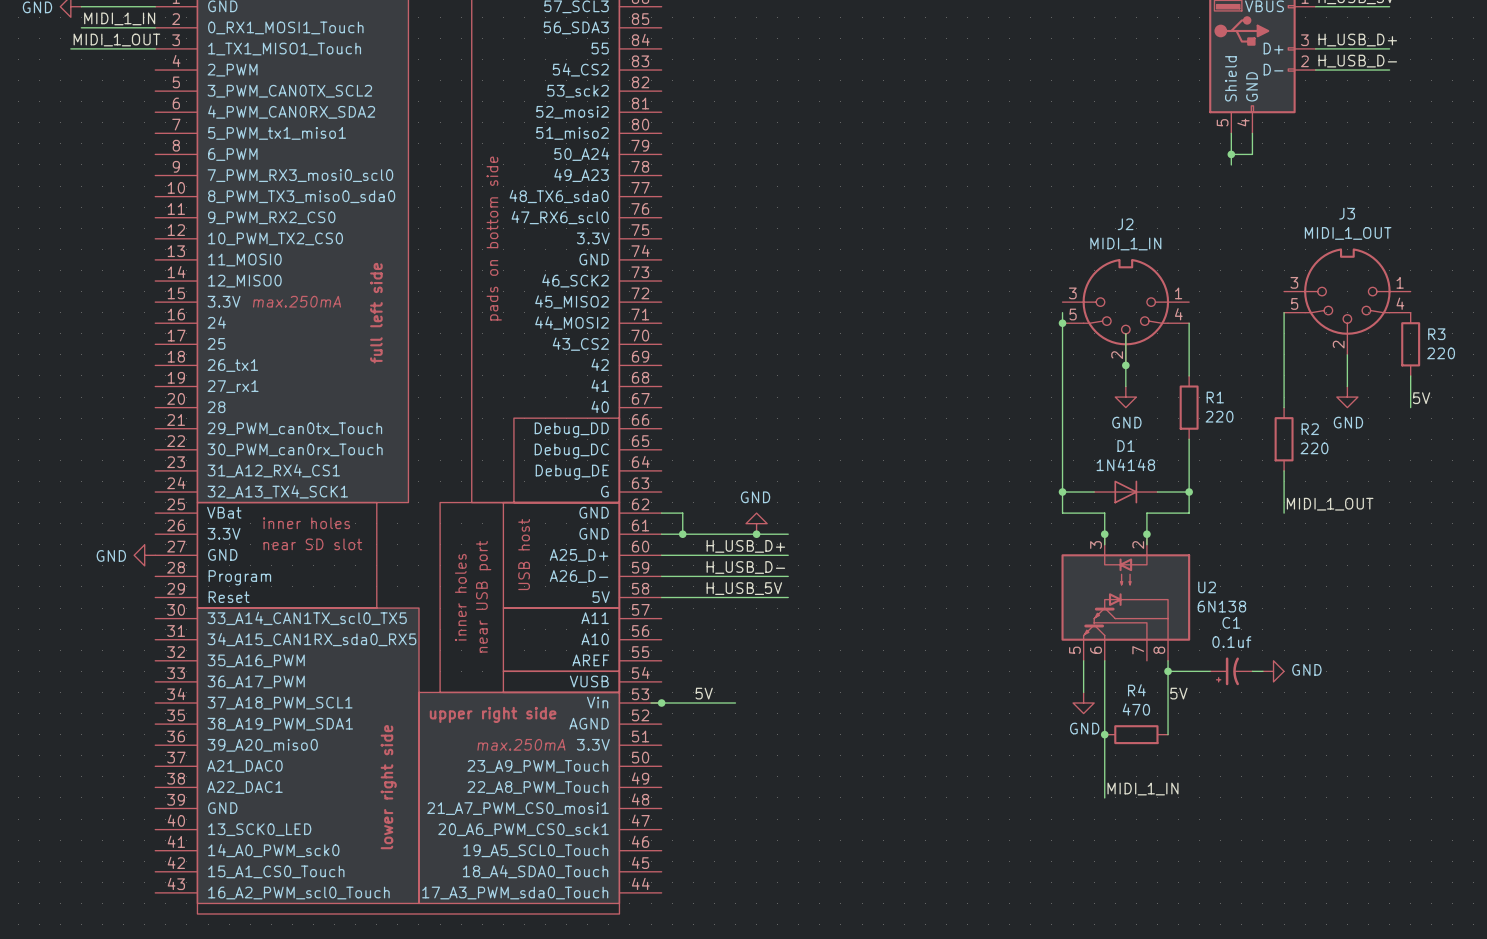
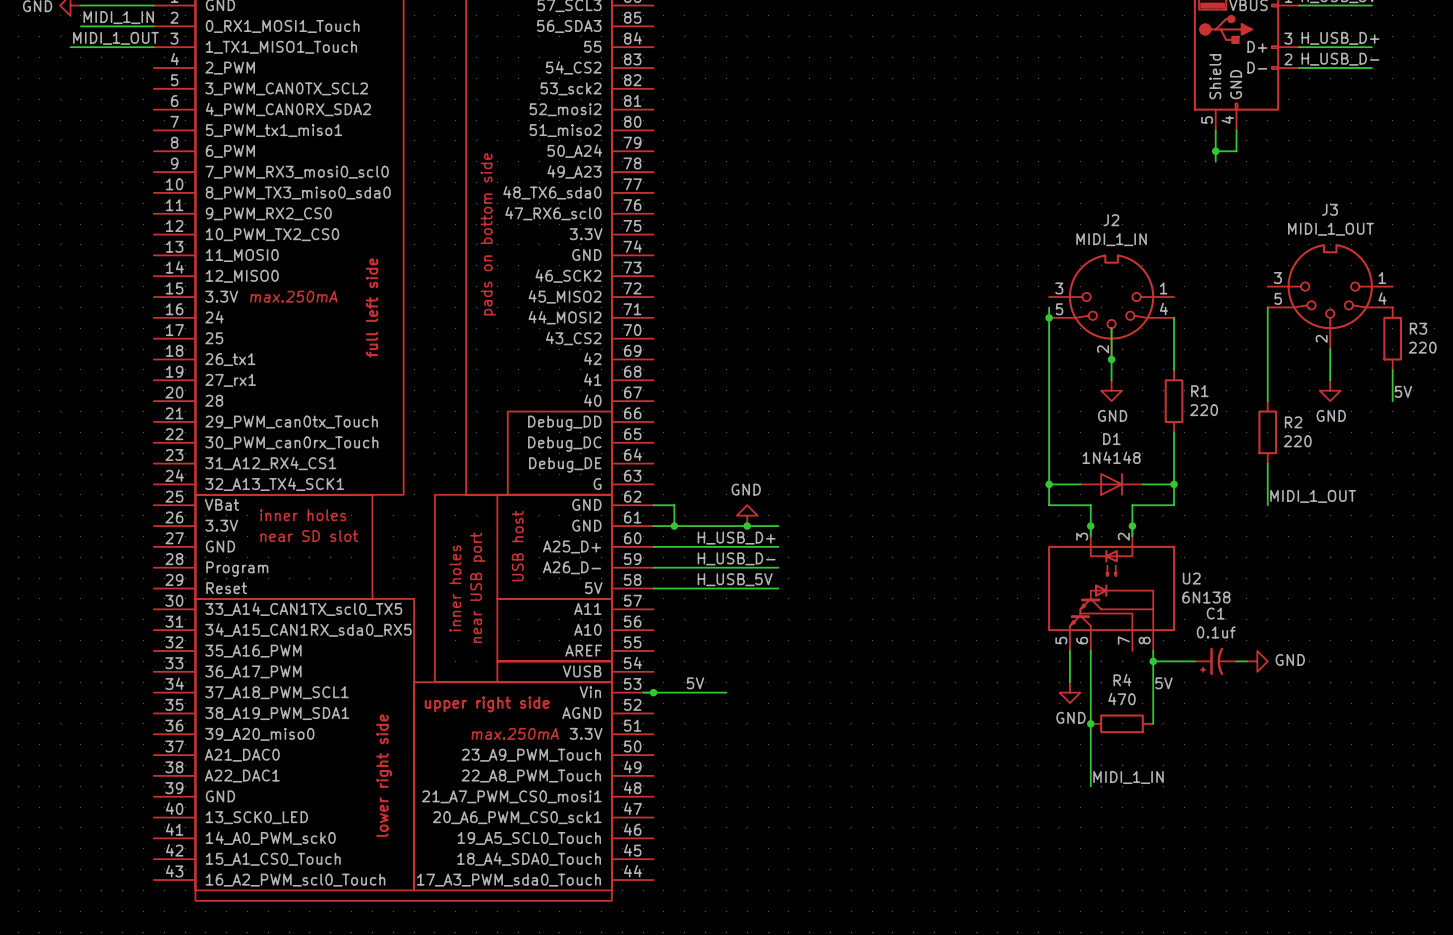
power symbol: GND (144, 555) -> none

